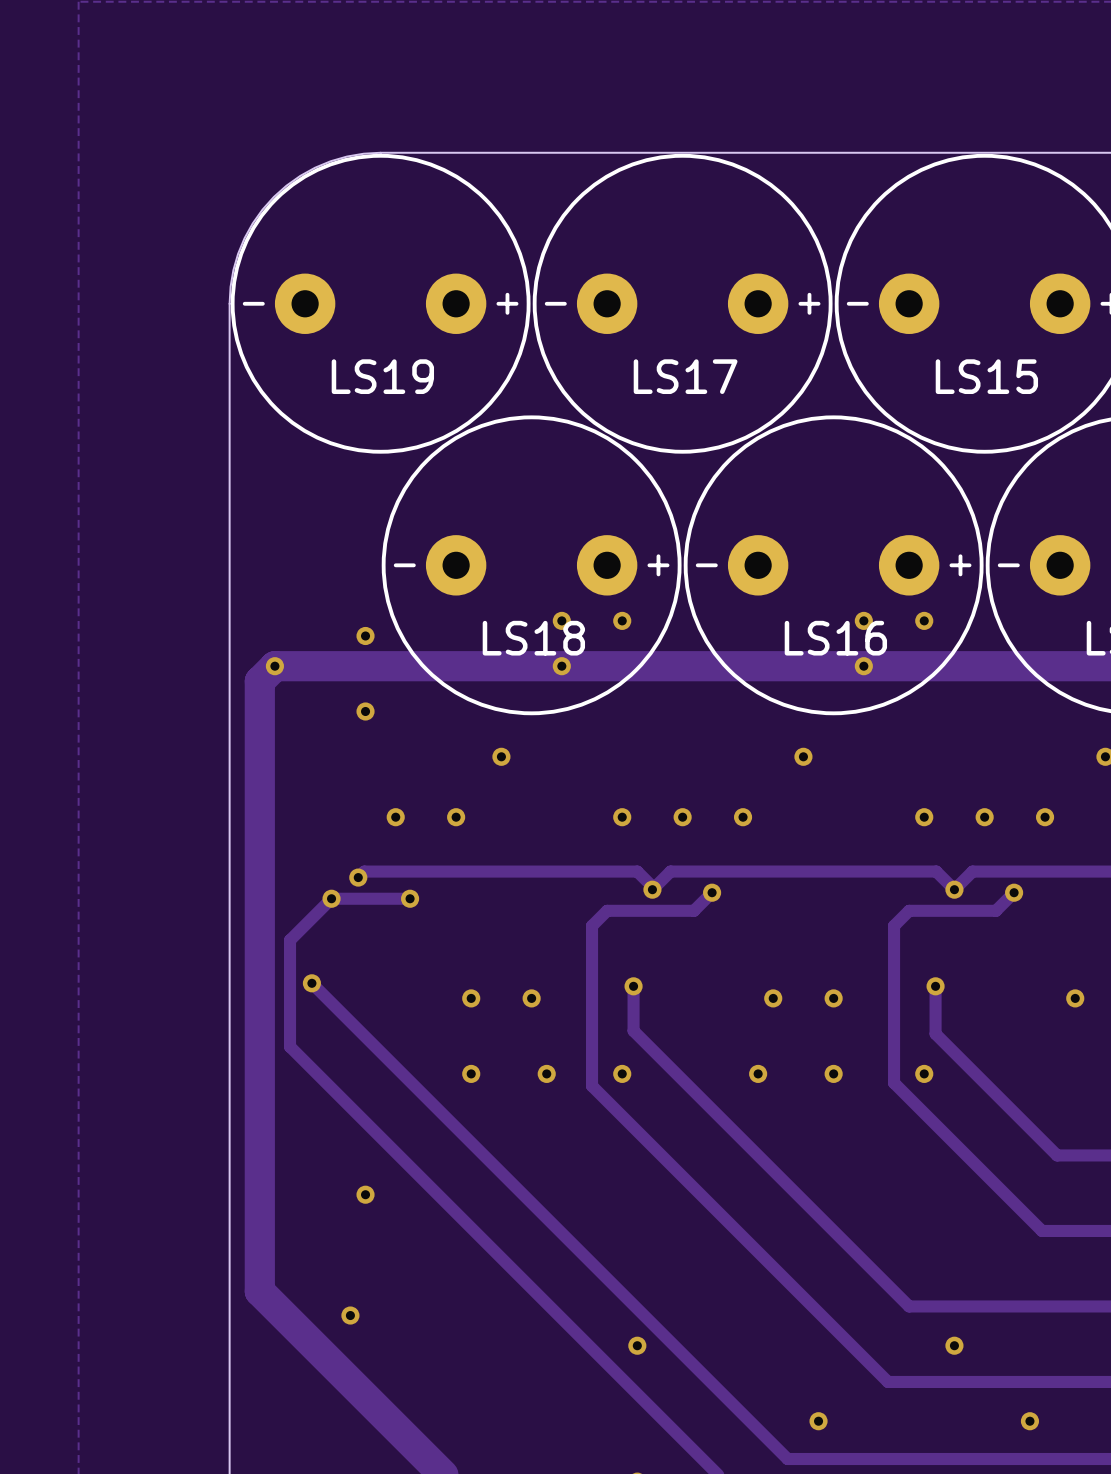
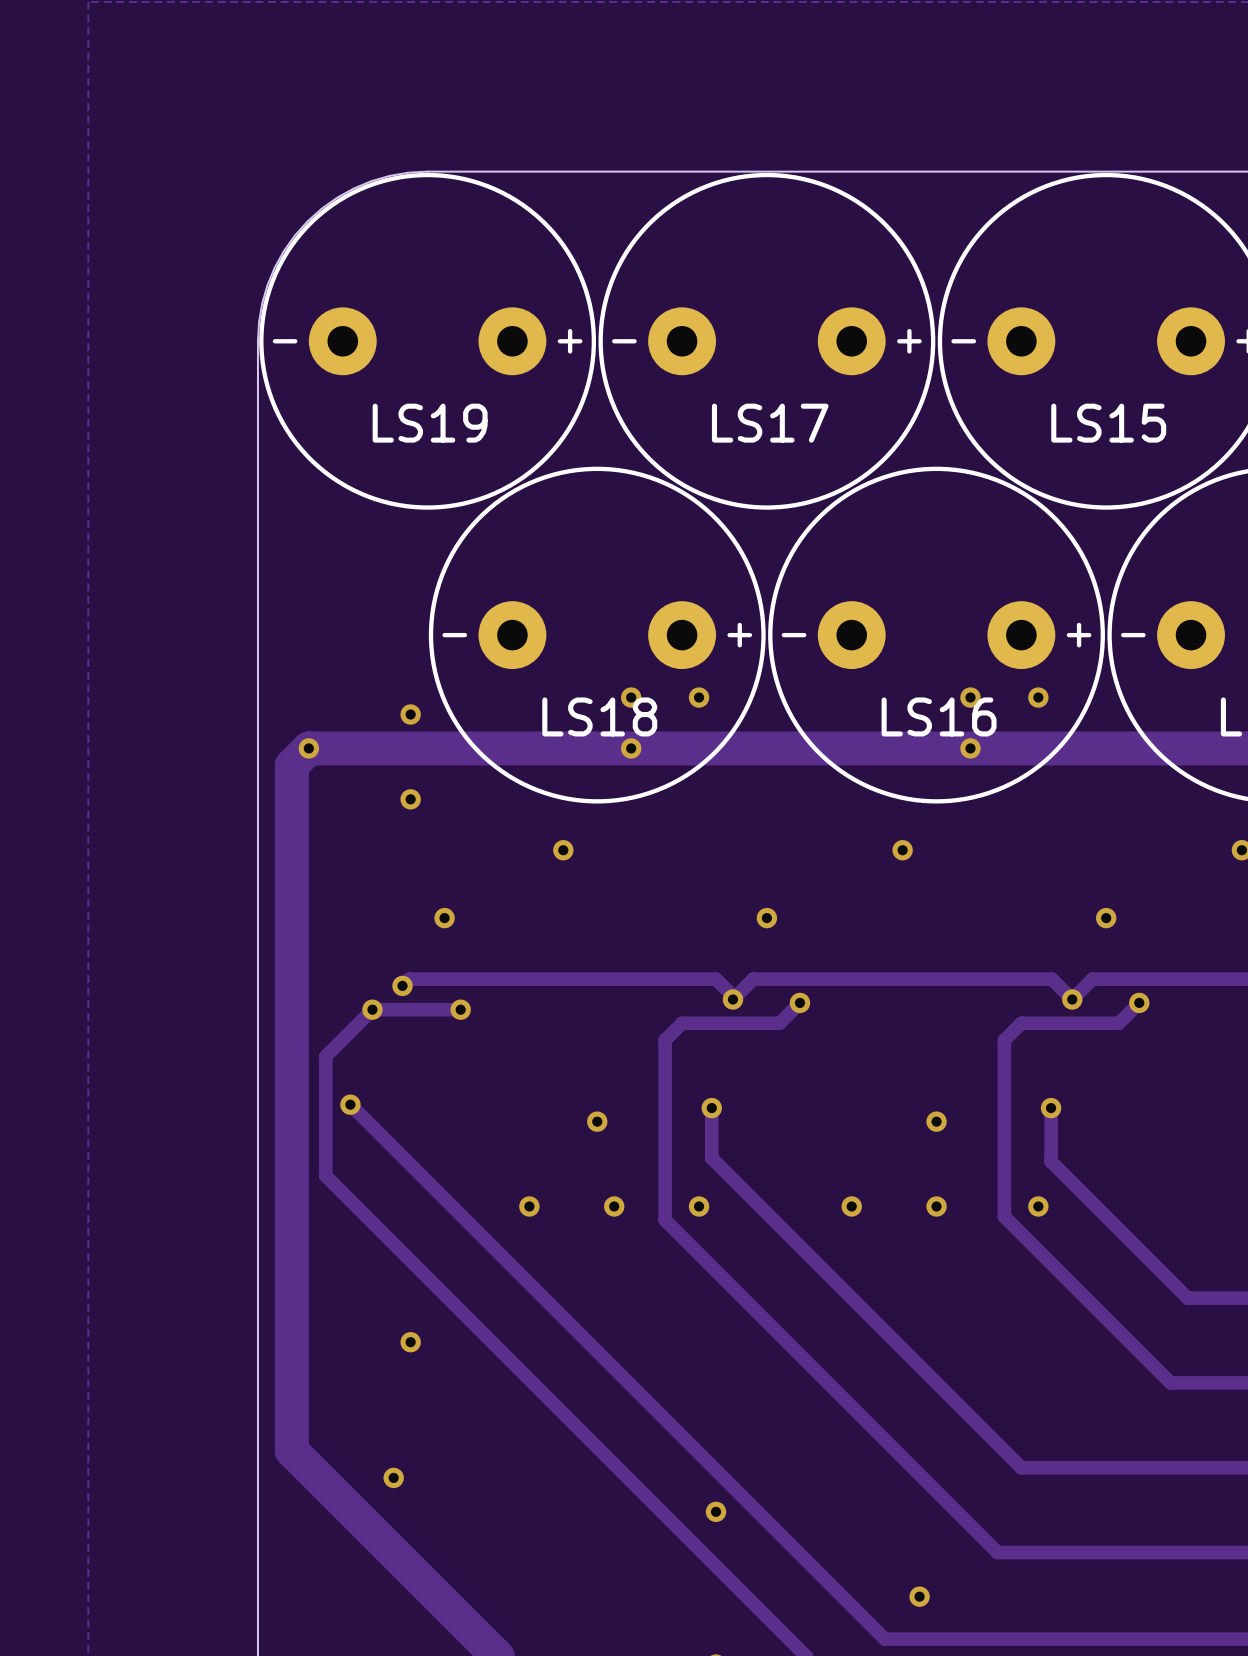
via: (456, 817) -> none
via: (622, 817) -> none
via: (743, 817) -> none
via: (924, 817) -> none
via: (1045, 817) -> none
via: (471, 998) -> none
via: (773, 998) -> none
via: (1075, 998) -> none
via: (954, 1345) -> none
via: (1029, 1421) -> none

